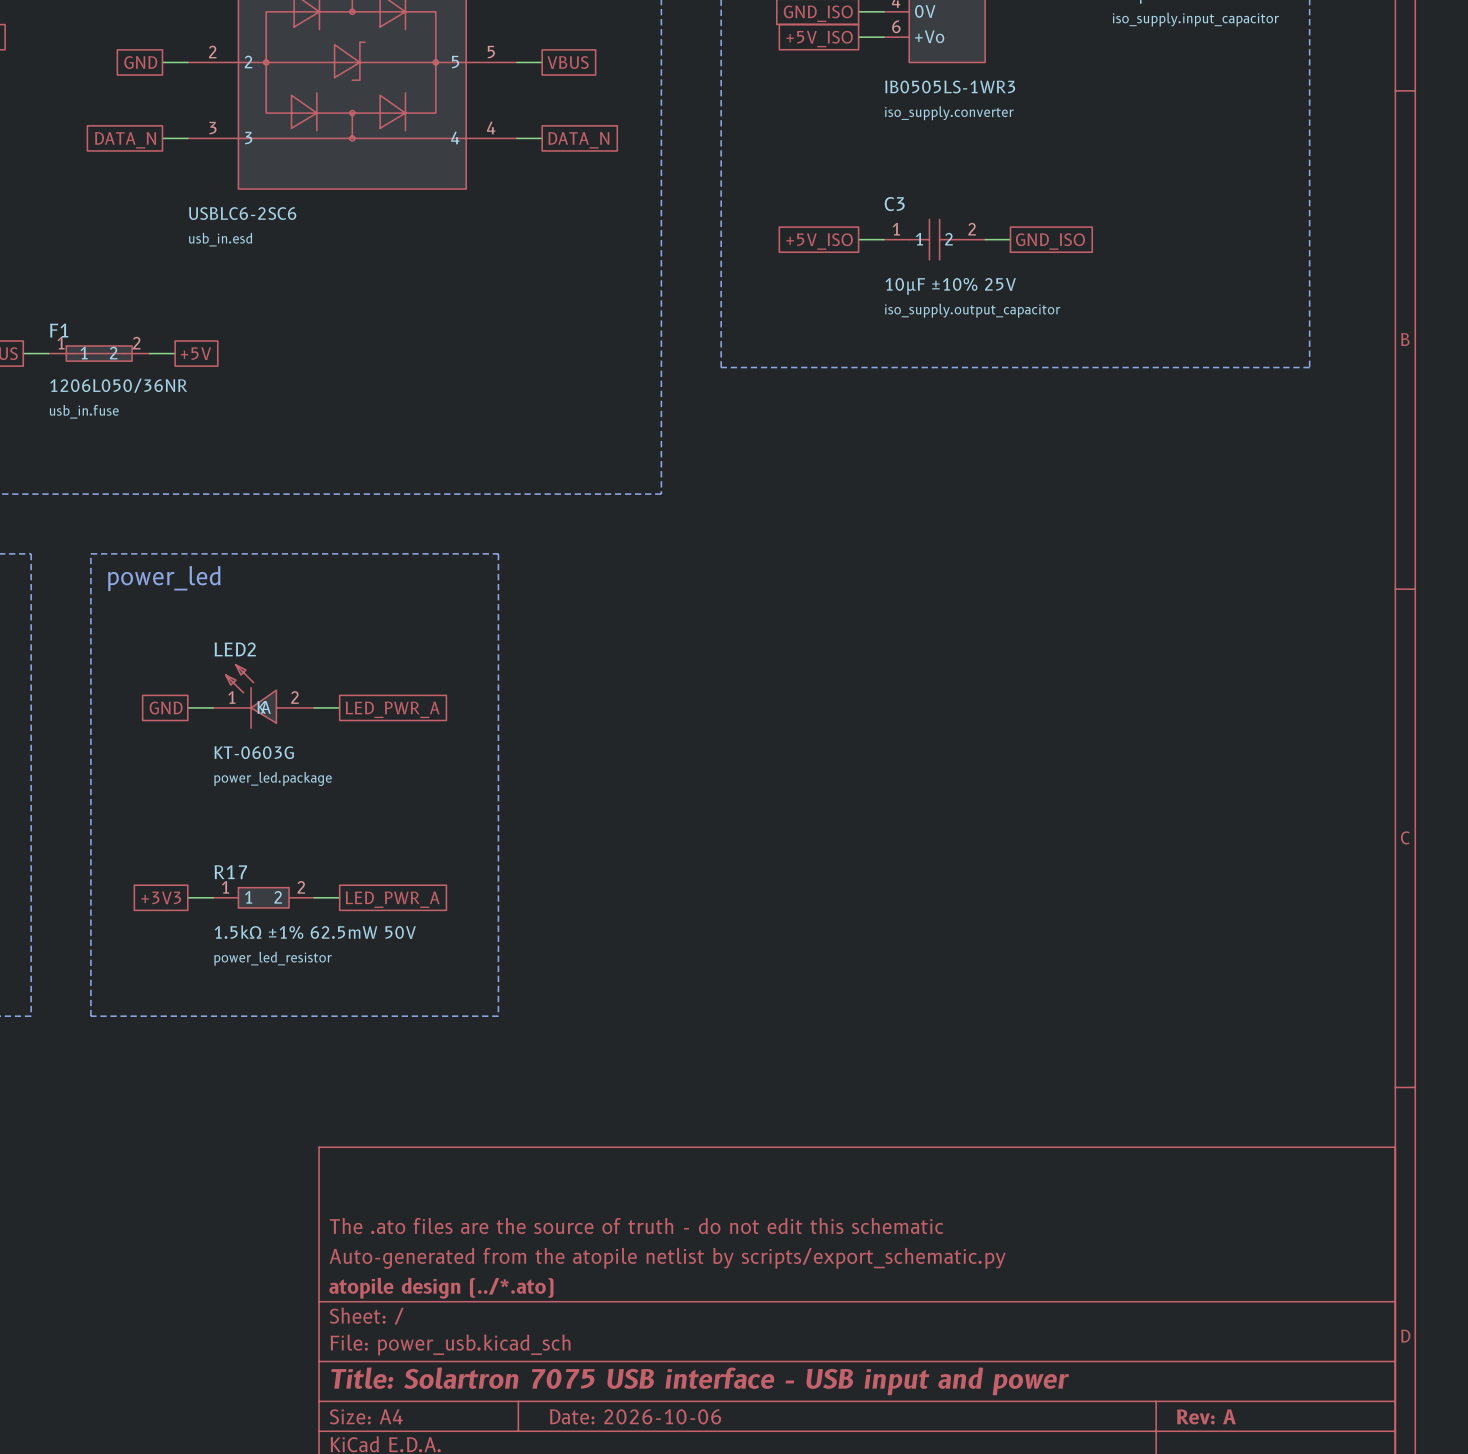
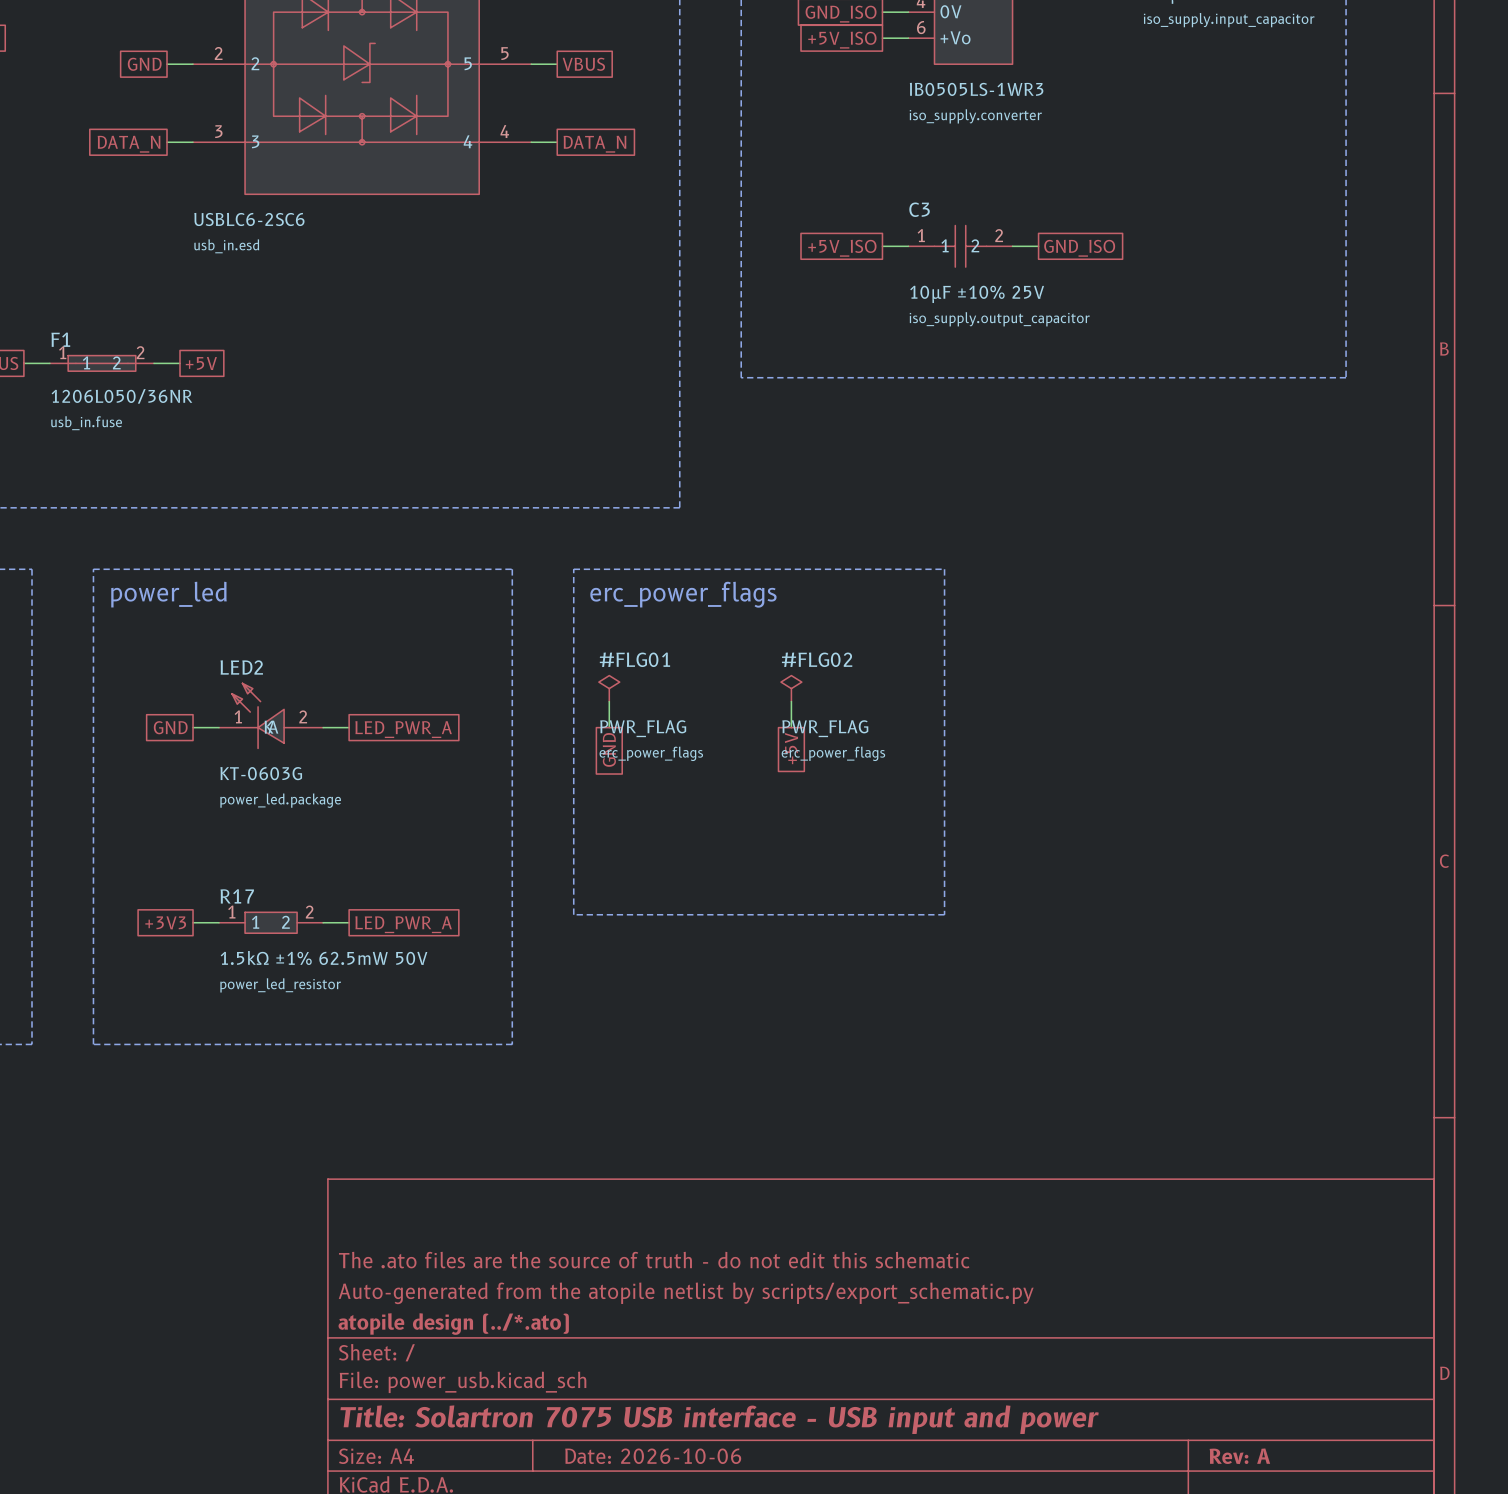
line: none -> (573, 569) (944, 569) (944, 914) (573, 914) (573, 569)
text: none -> erc_power_flags (683, 594)
#FLG01: none -> PWR_FLAG (609, 688)
#FLG02: none -> PWR_FLAG (791, 688)
wire: none -> (609, 701) (609, 727)
wire: none -> (791, 701) (791, 727)
global label: none -> +5V (791, 748)
global label: none -> GND (609, 749)

